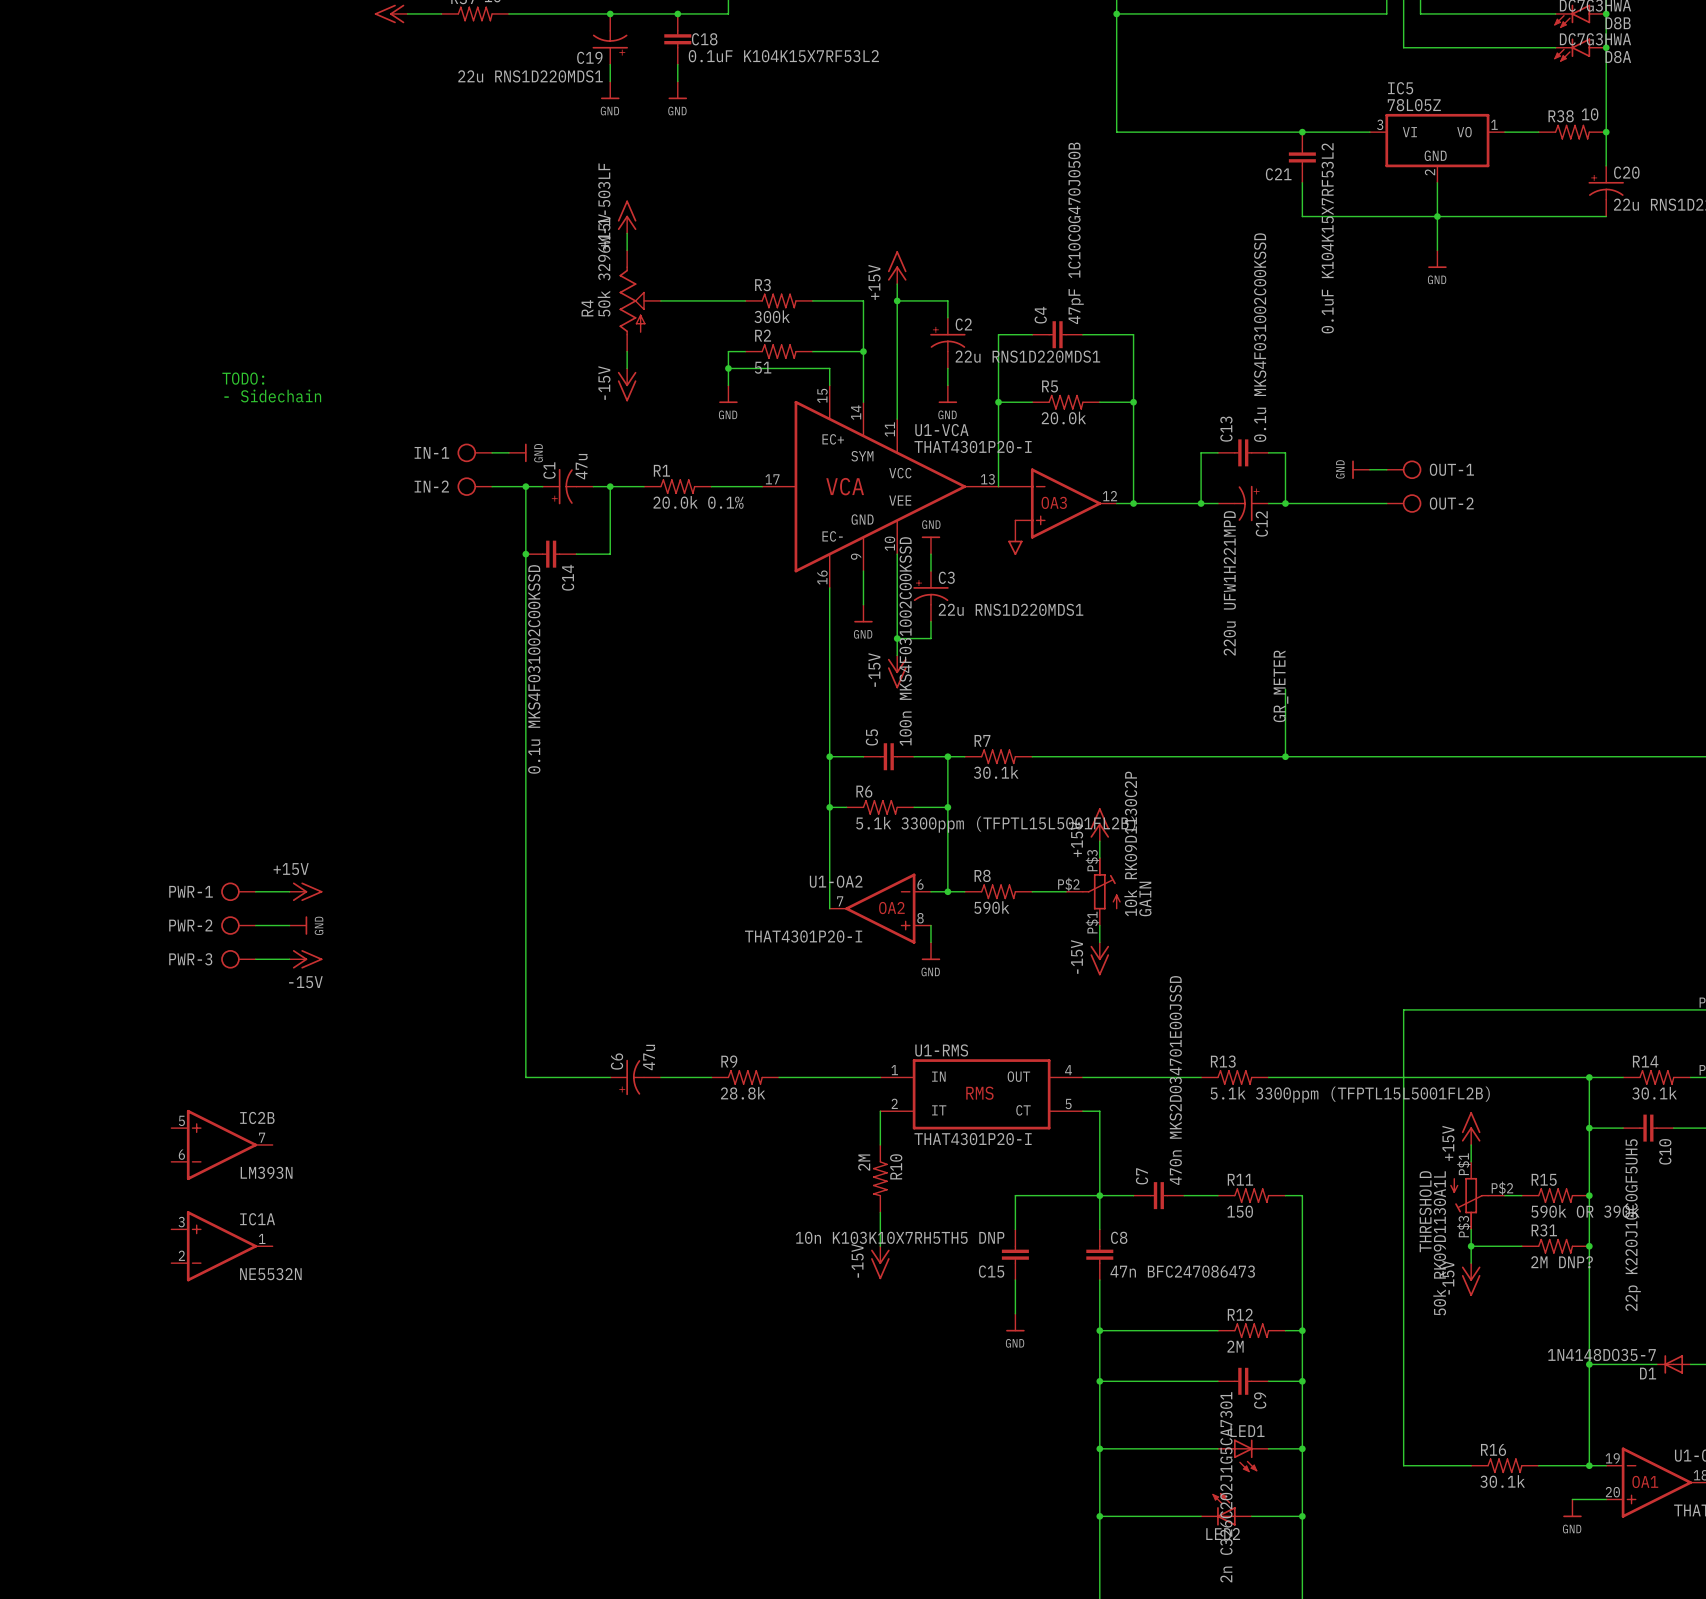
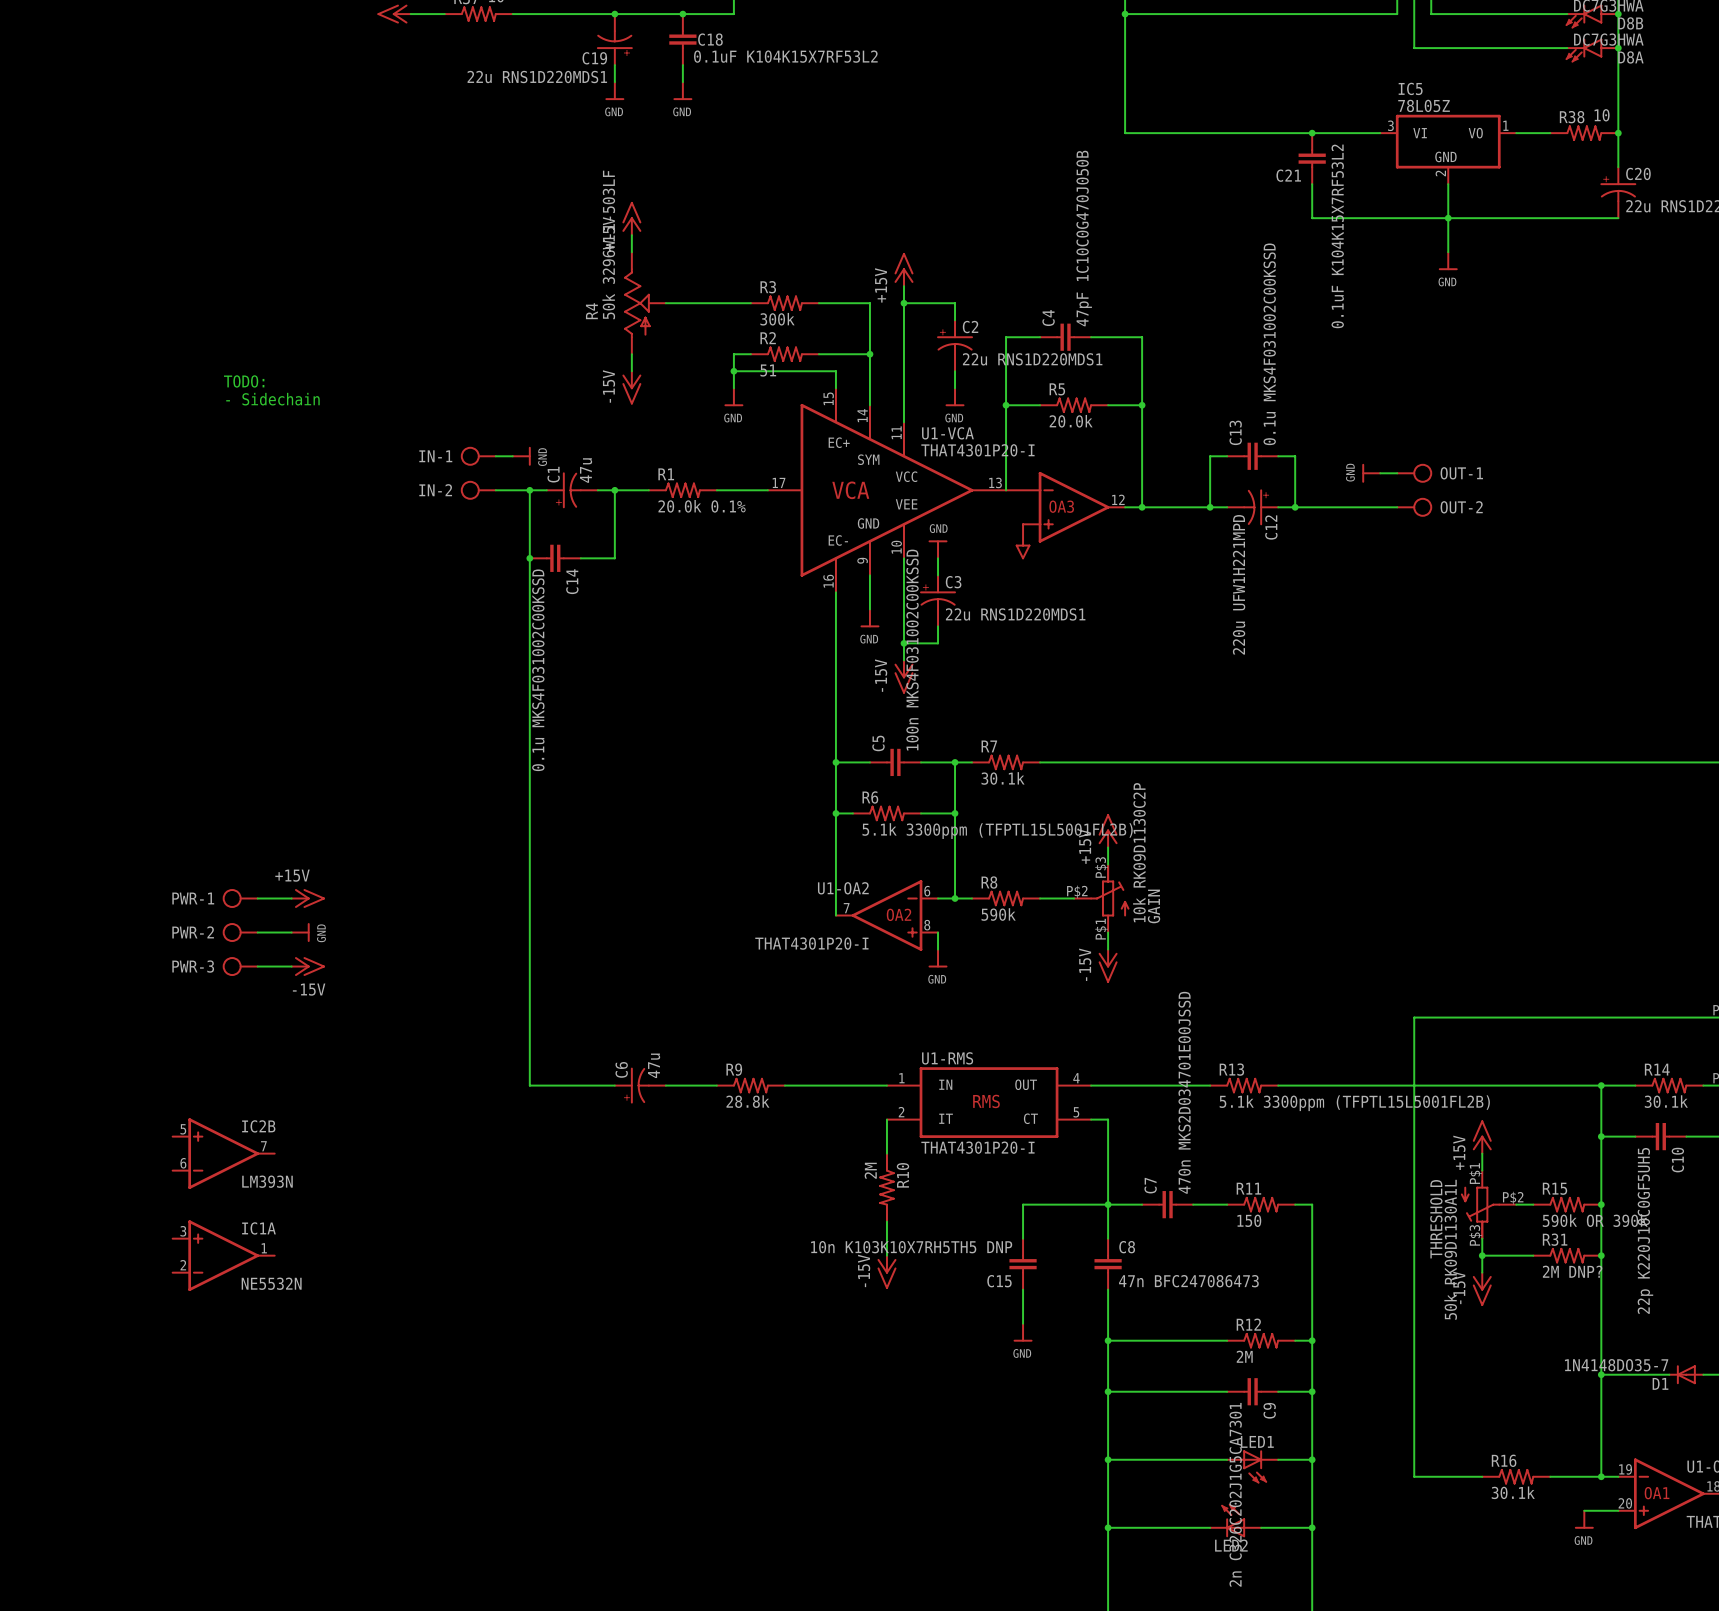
label: GR_METER (1280, 686) -> none
wire: (1285, 689) (1285, 756) -> none
junction: (1285, 756) -> none

